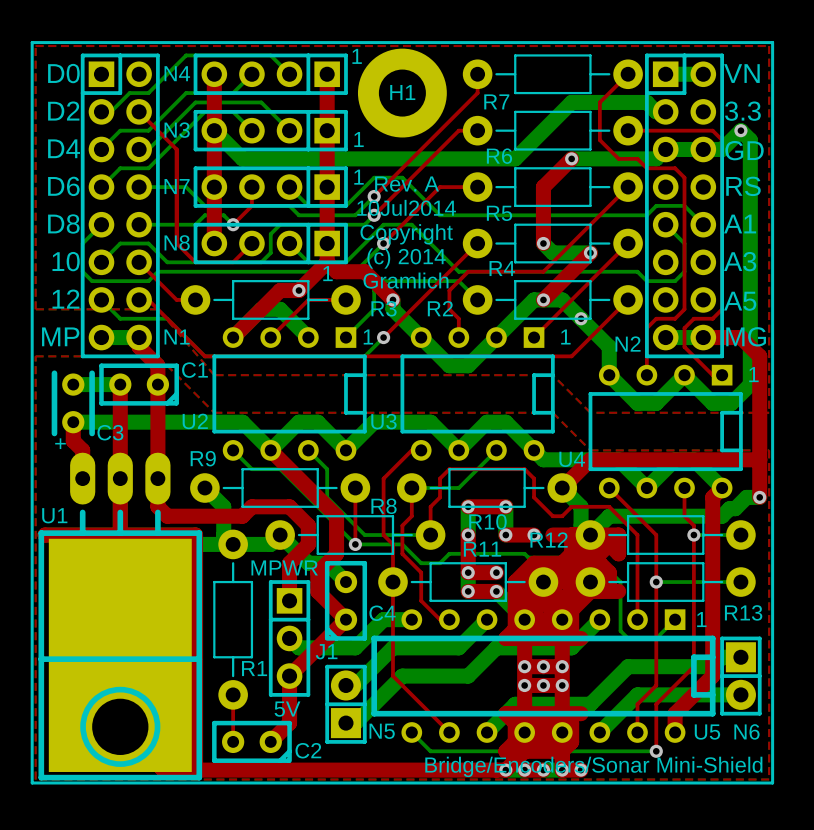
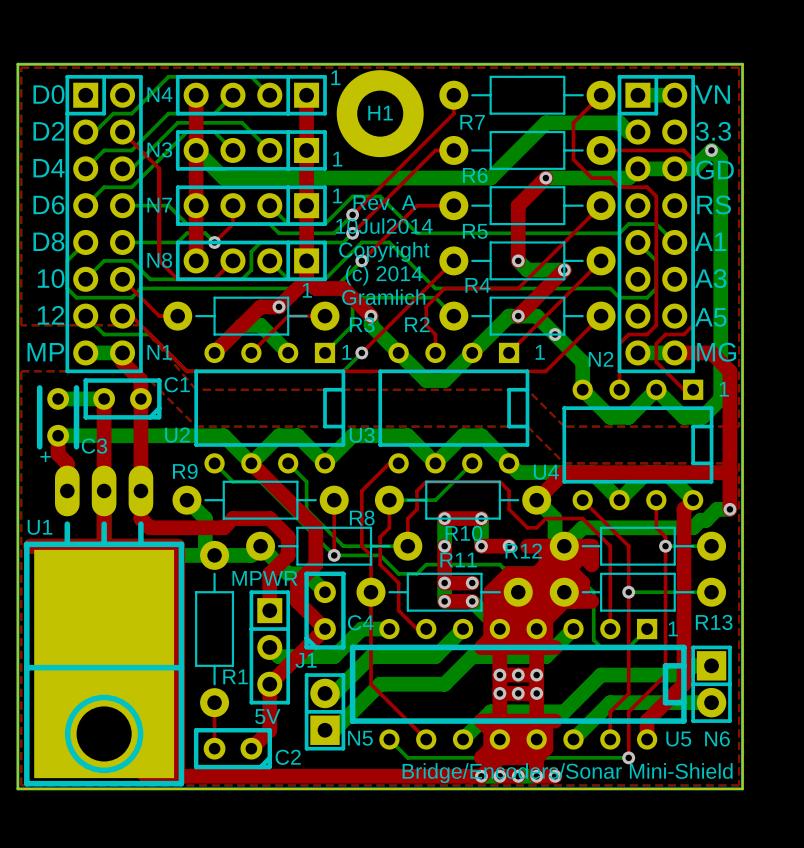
board edge: none -> (17, 64) (17, 788) (742, 788) (742, 64) (17, 64)

